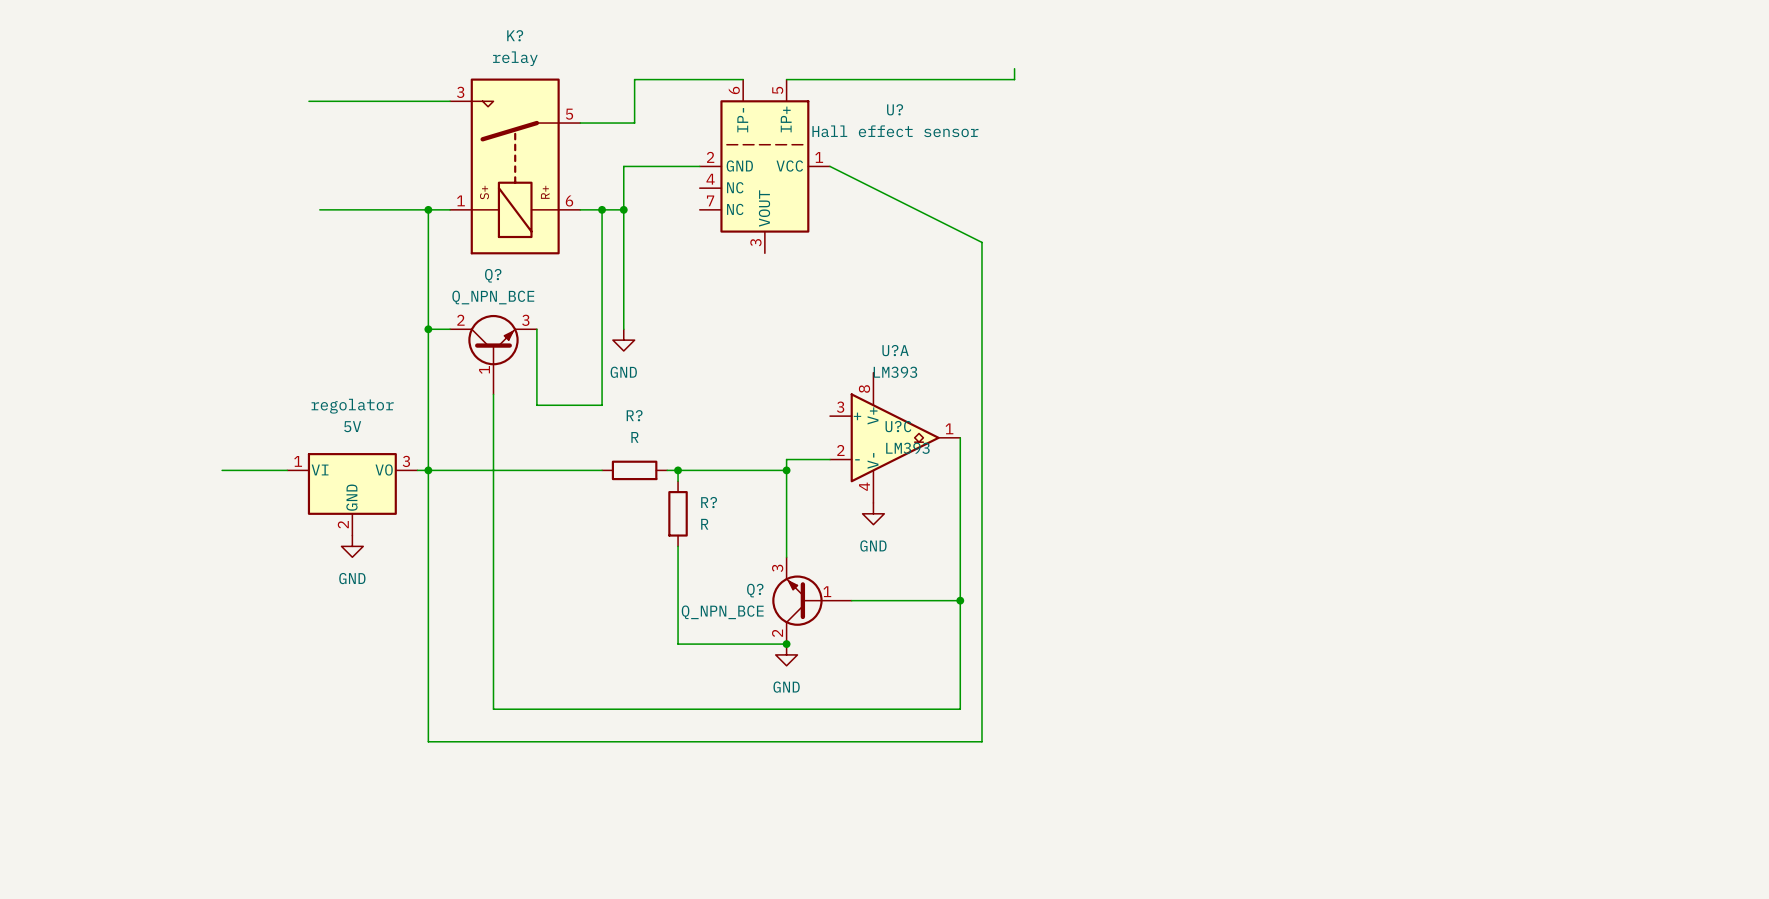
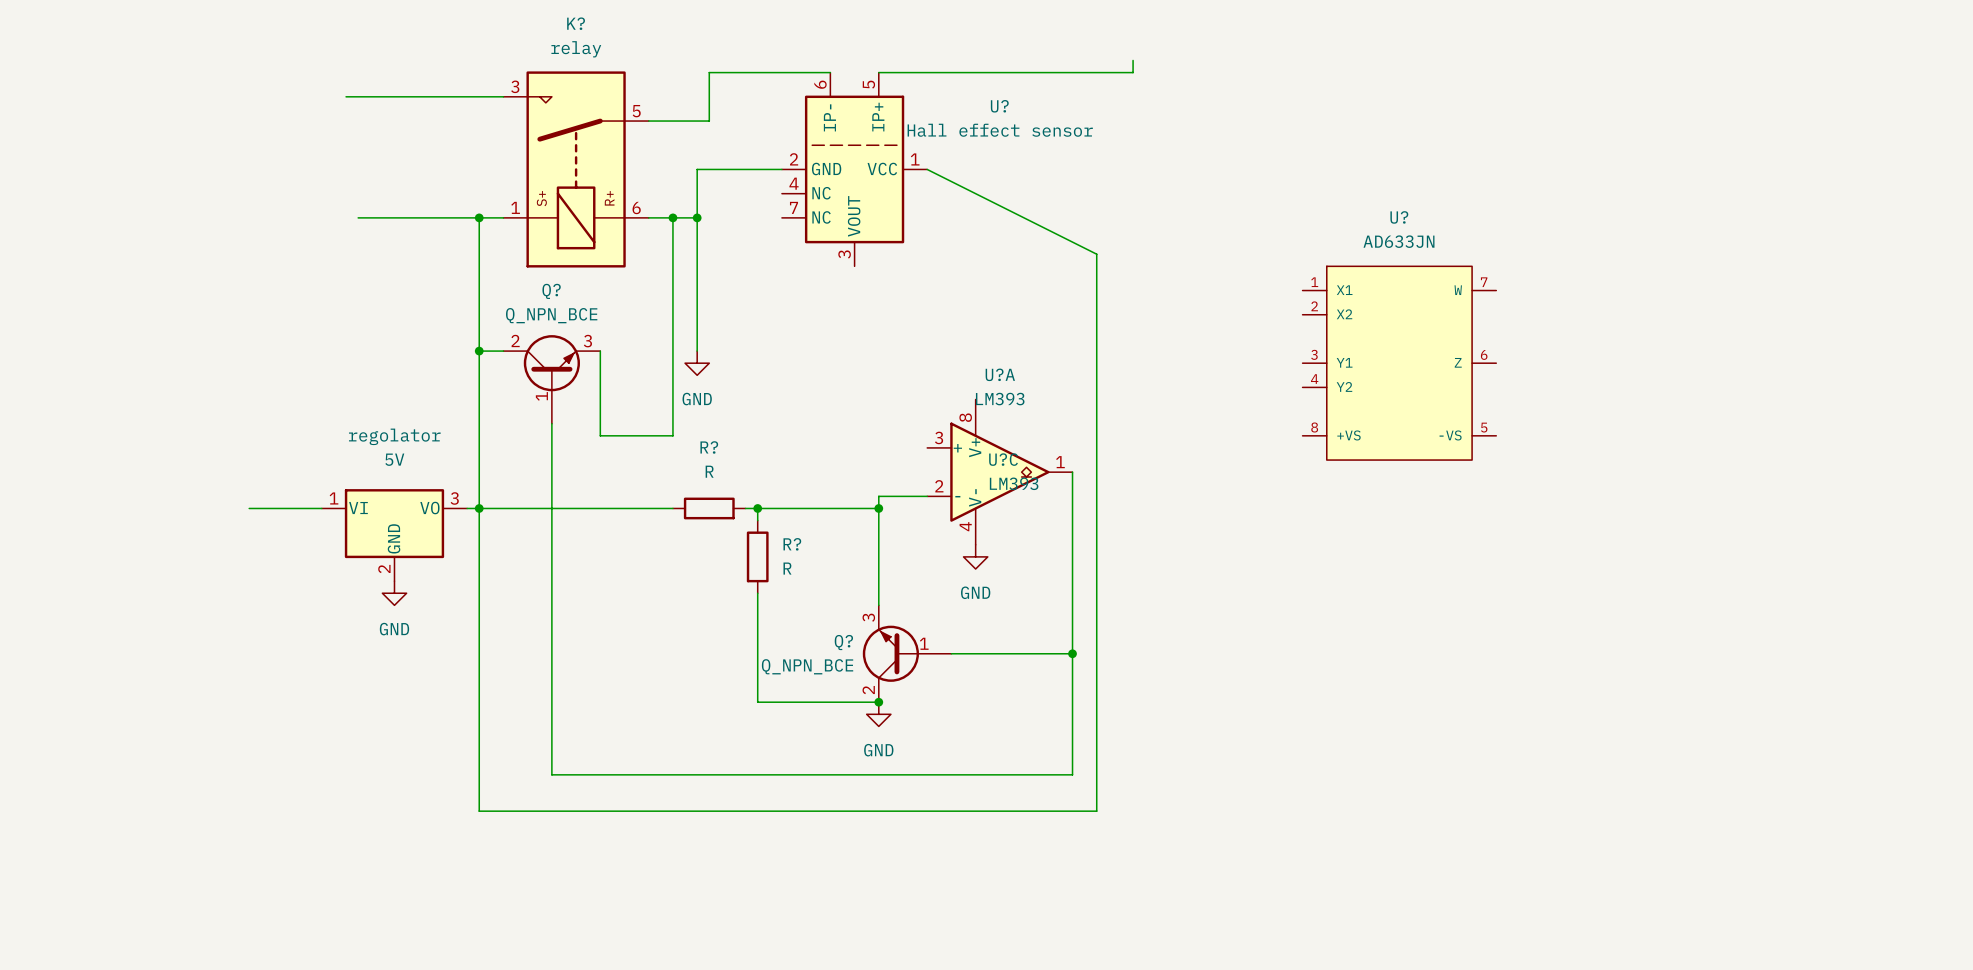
U?: none -> AD633JN (1399, 363)

